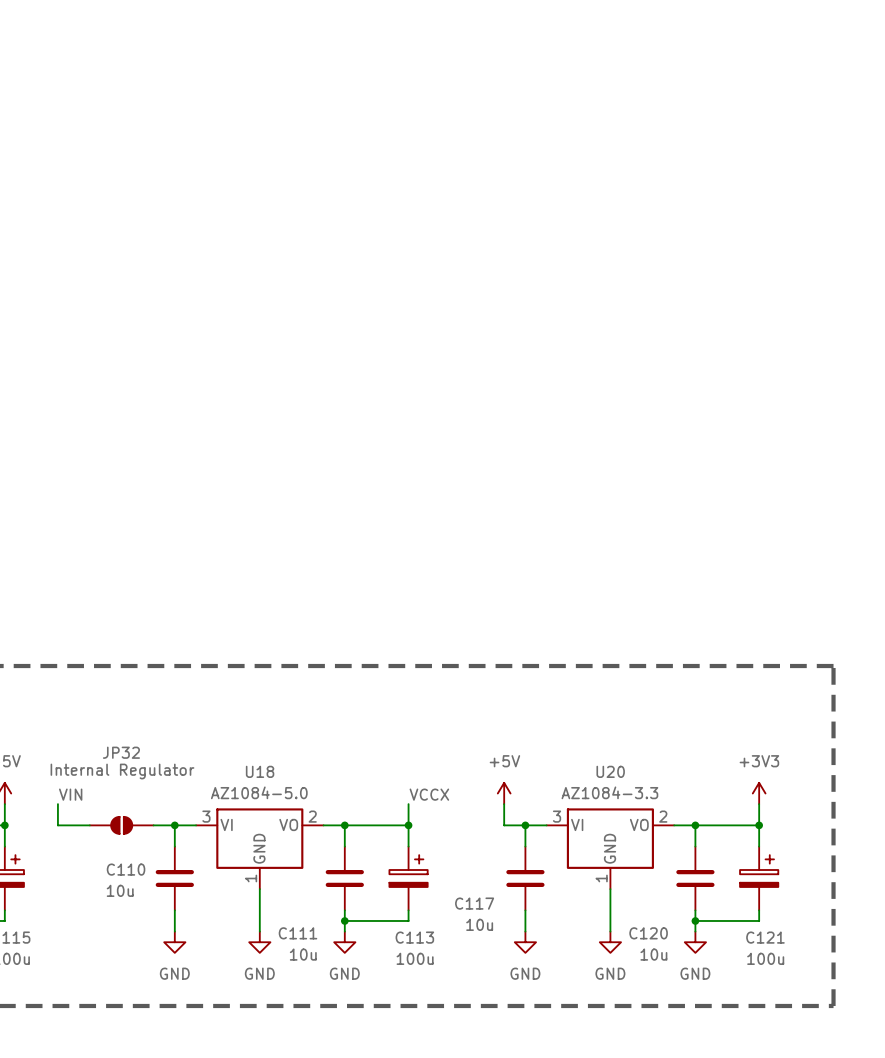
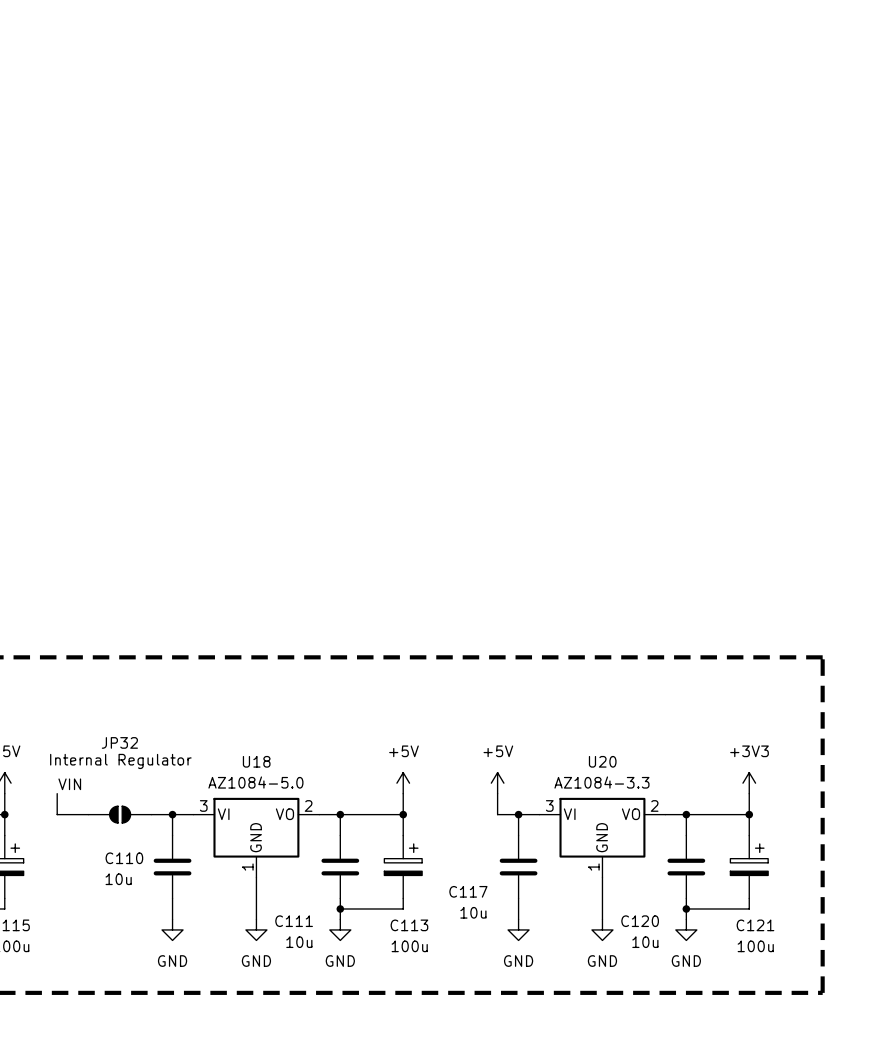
power symbol: none -> +5V (403, 783)
label: VCCX (429, 794) -> none

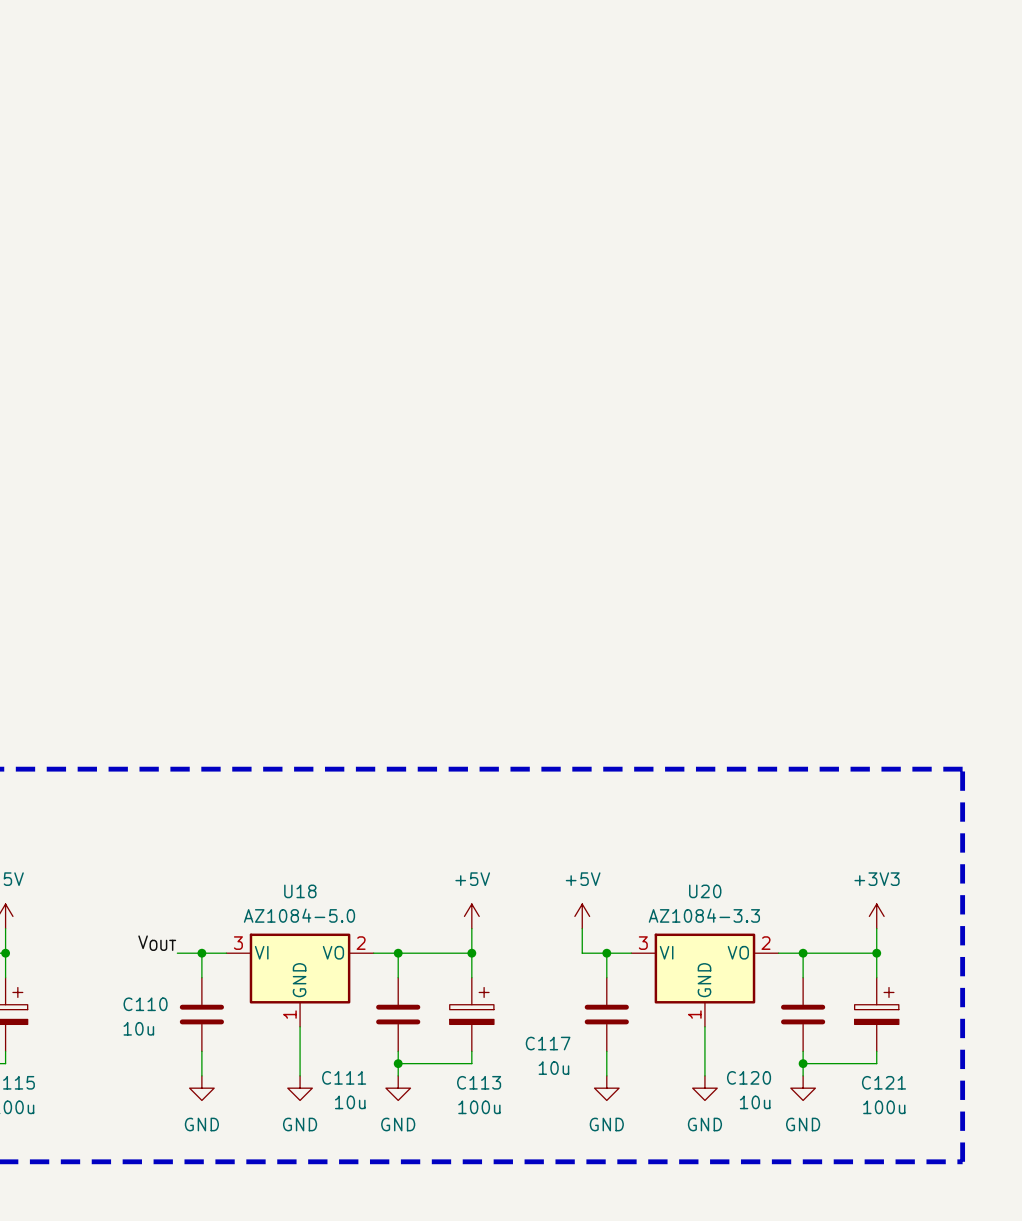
label: VIN (69, 784) -> none
wire: (57, 793) (57, 814) (88, 814) -> none
label: none -> VOUT (157, 943)
JP32: Internal Regulator (120, 814) -> none

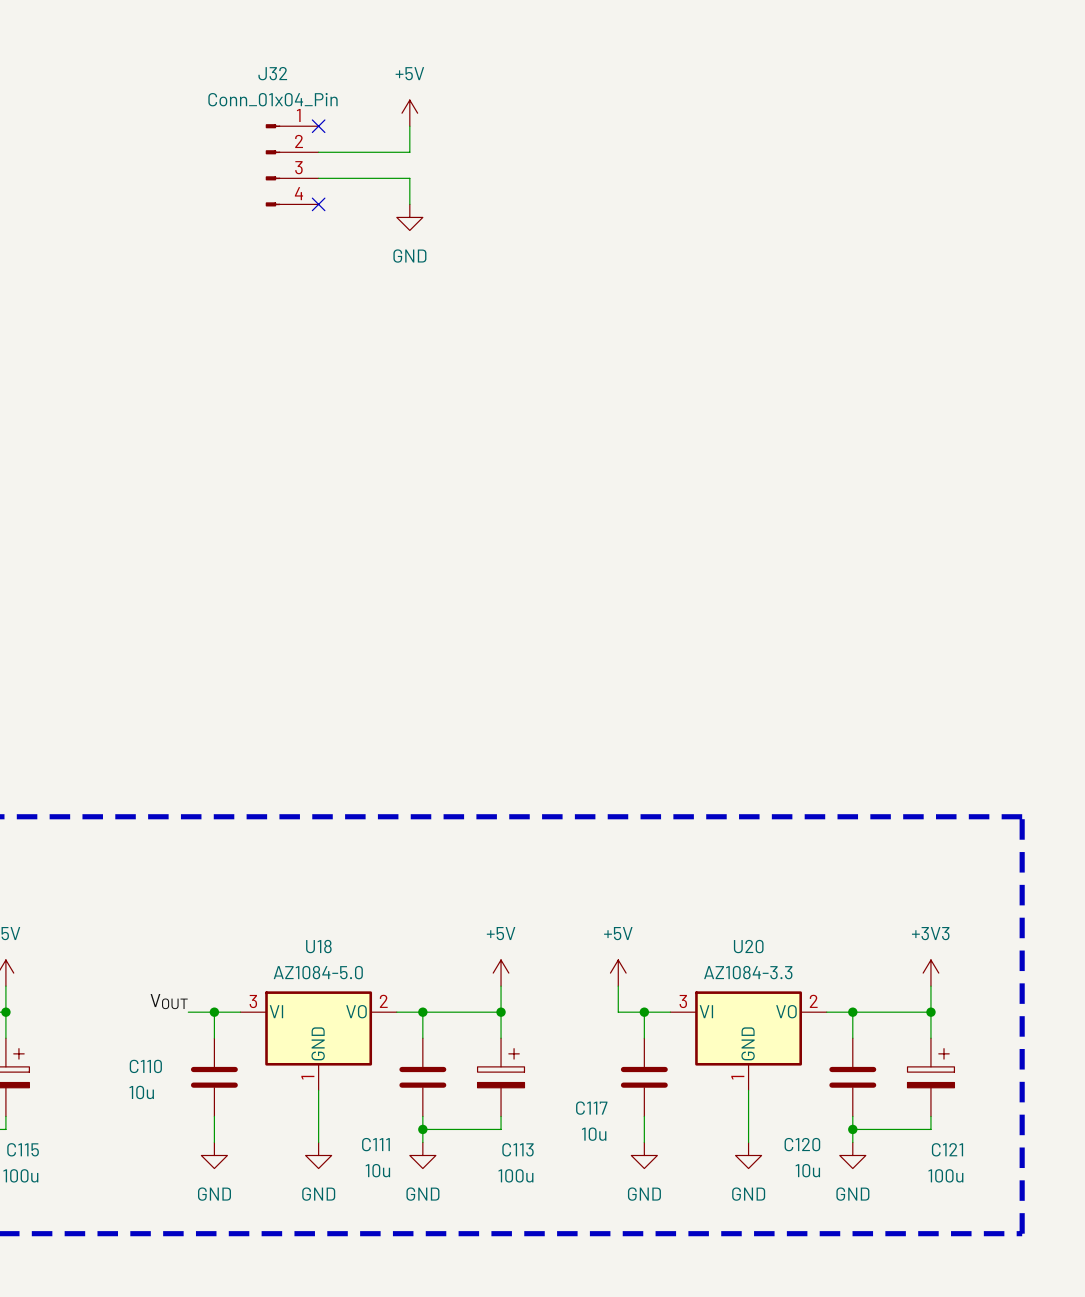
power symbol: none -> +5V (409, 113)
no-connect mark: none -> (318, 126)
wire: none -> (409, 126) (409, 152) (318, 152)
J32: none -> Conn_01x04_Pin (292, 165)
wire: none -> (318, 178) (409, 178) (409, 204)
no-connect mark: none -> (318, 204)
power symbol: none -> GND (409, 217)

